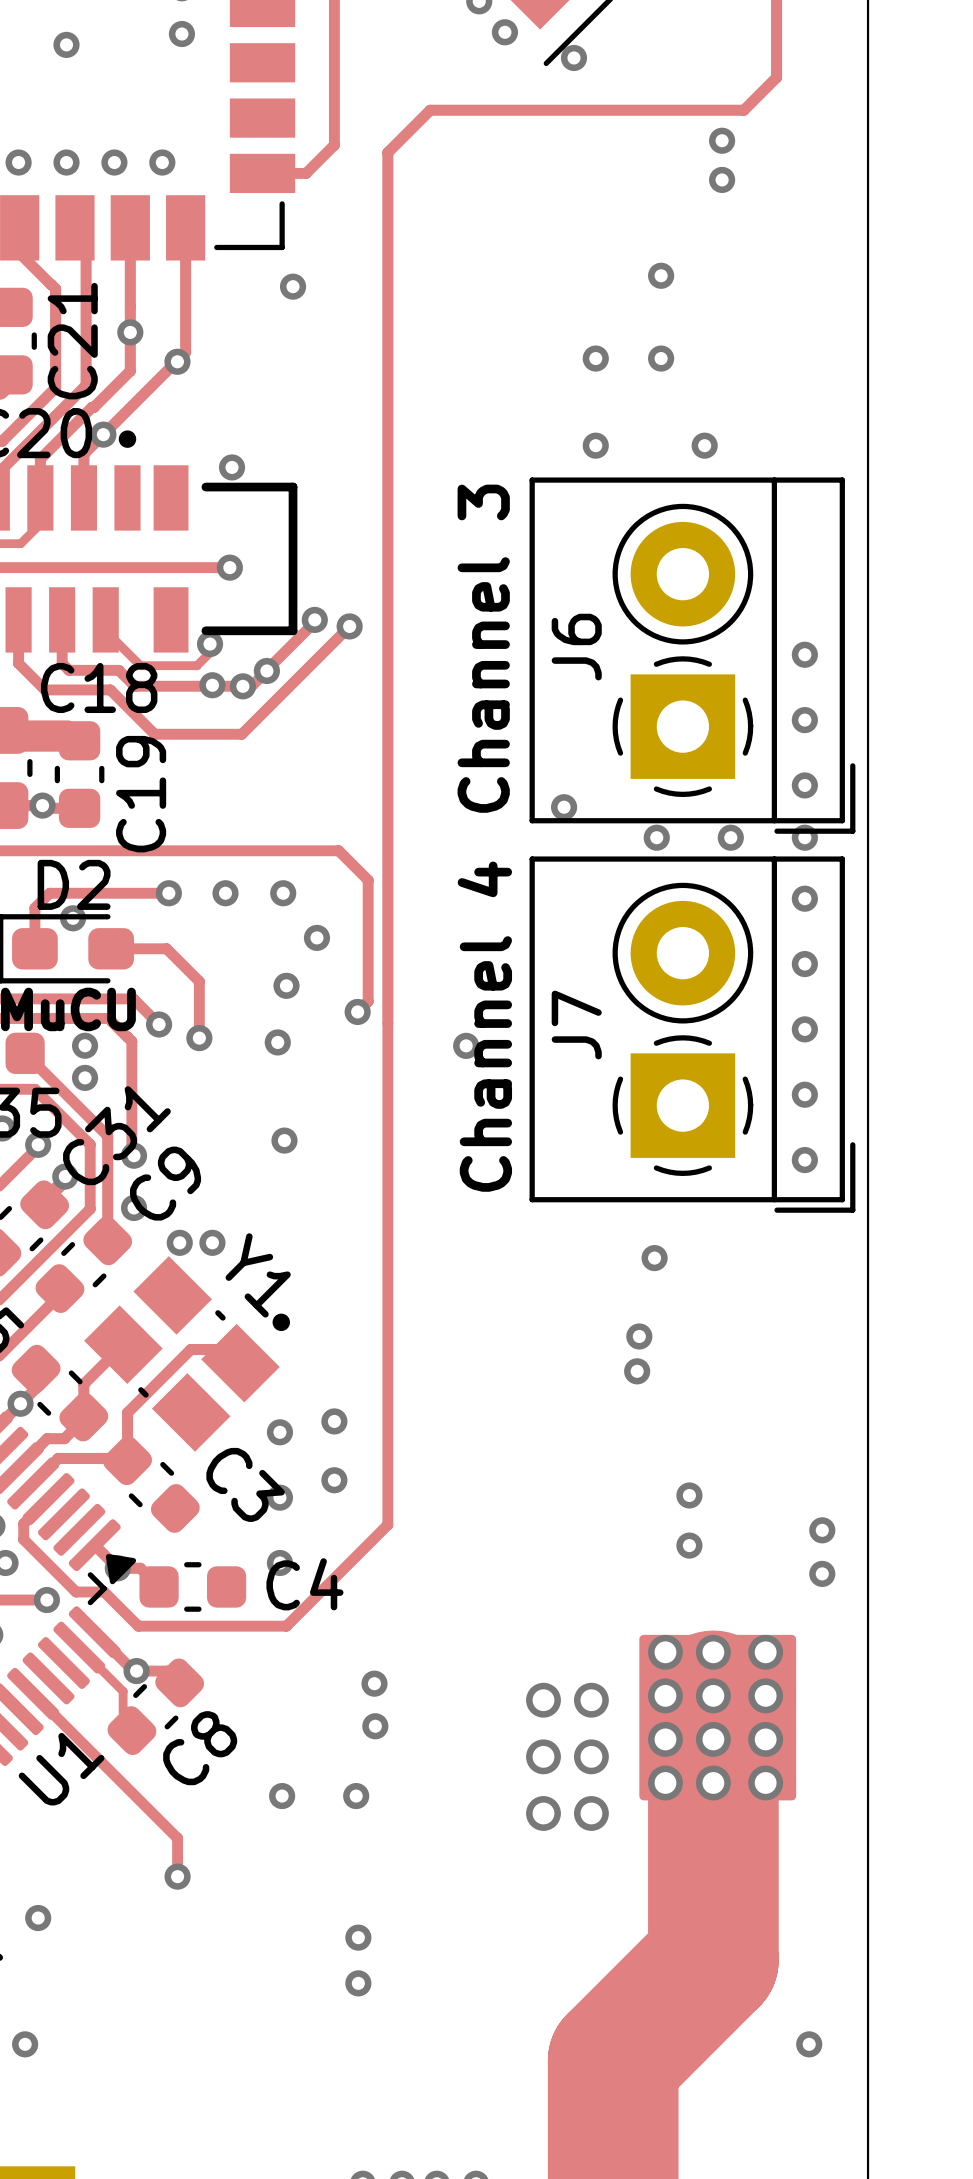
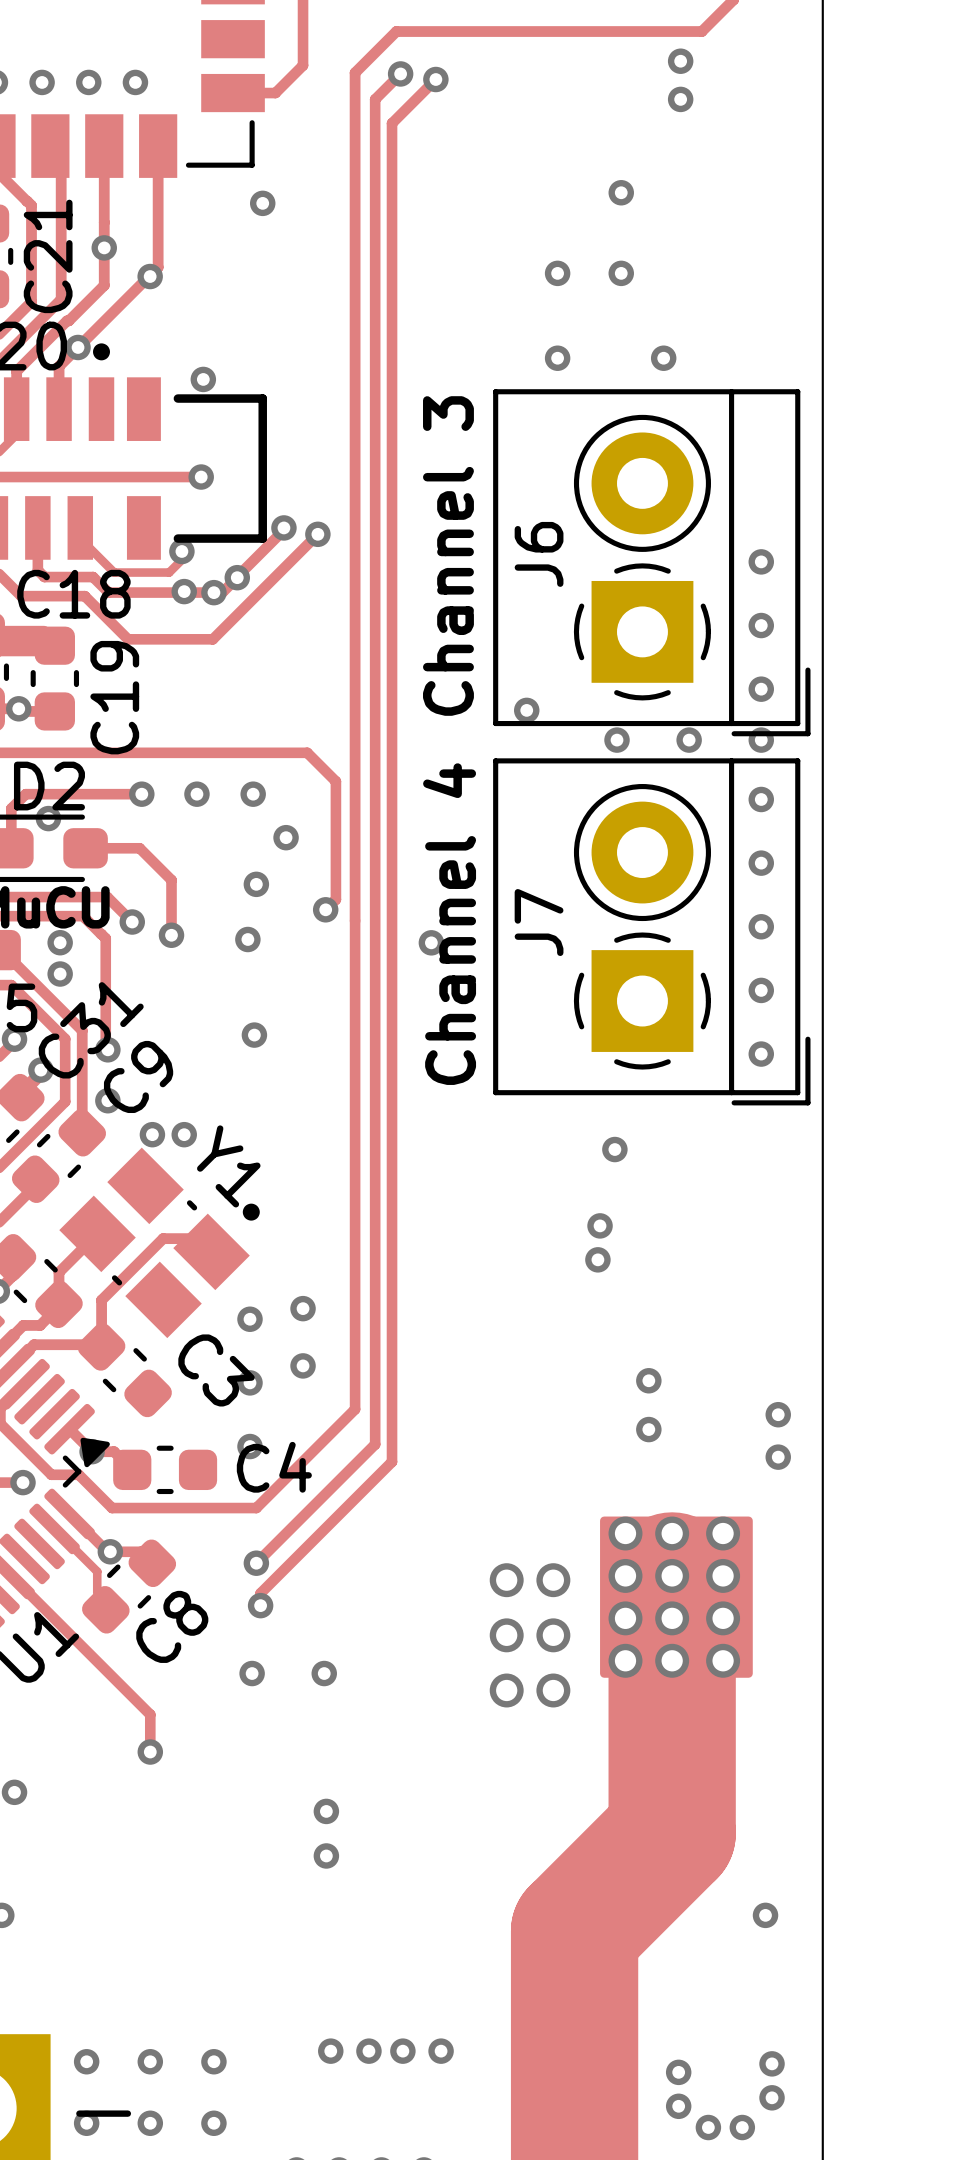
track: none -> (400, 73) (375, 99) (375, 1444) (256, 1563)
via: none -> (400, 73)
track: none -> (435, 79) (392, 123) (392, 1461) (260, 1593) (260, 1605)
via: none -> (435, 79)
via: none -> (256, 1563)
via: (374, 1683) -> none
via: none -> (260, 1605)
via: (375, 1726) -> none

